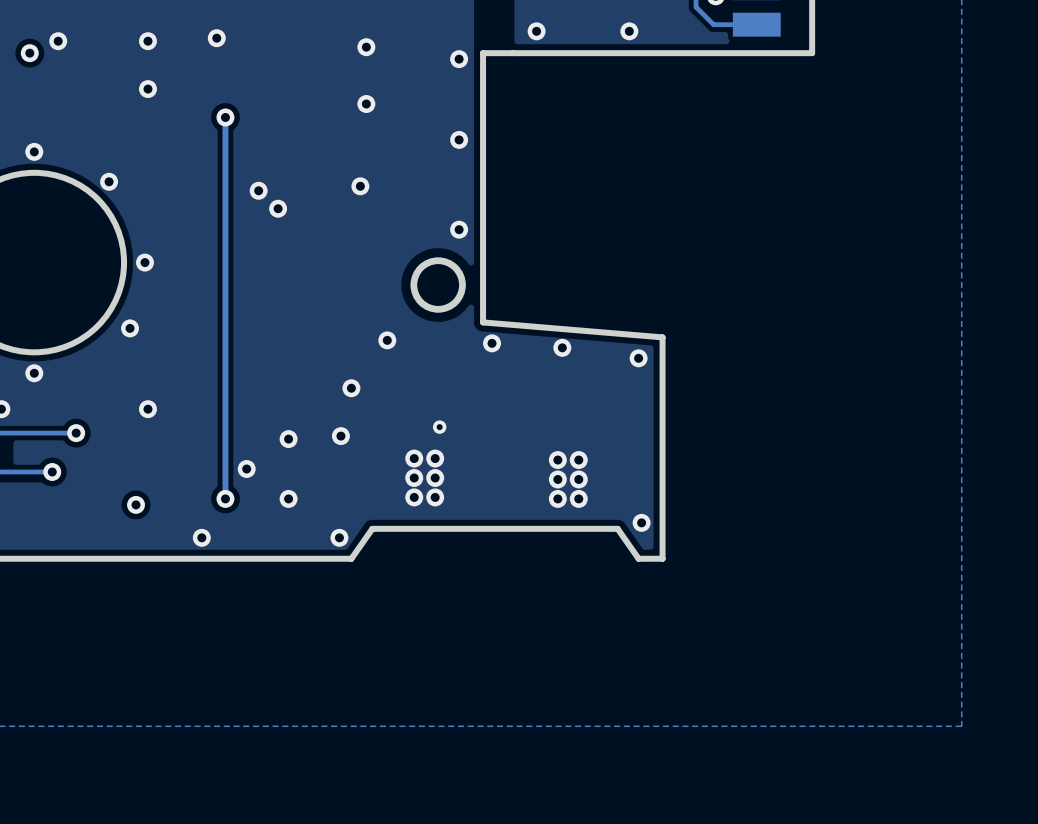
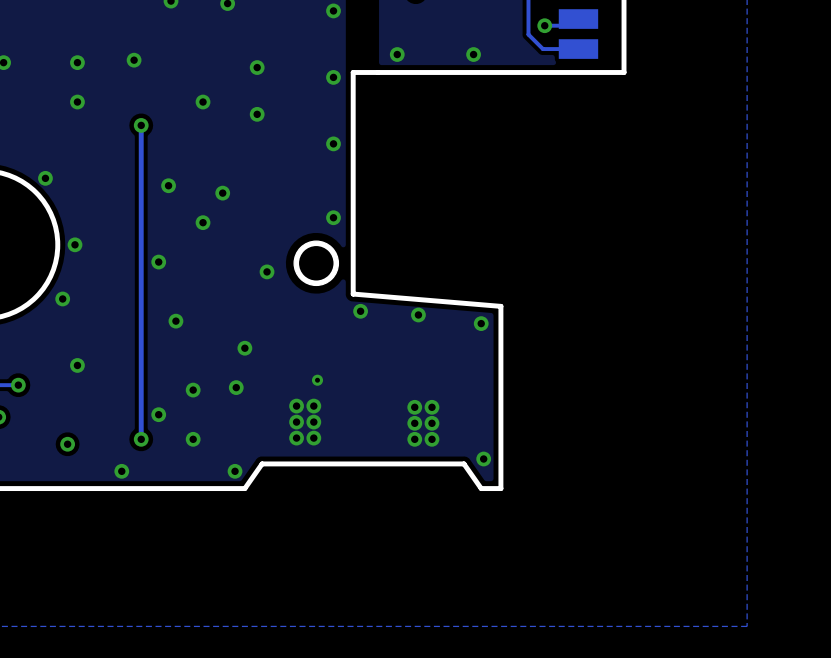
via: none -> (203, 102)
via: (360, 186) -> none
via: none -> (222, 193)
via: (278, 208) -> none
via: none -> (203, 222)
via: none -> (158, 262)
via position: (387, 340) -> (267, 271)
via: none -> (175, 321)

